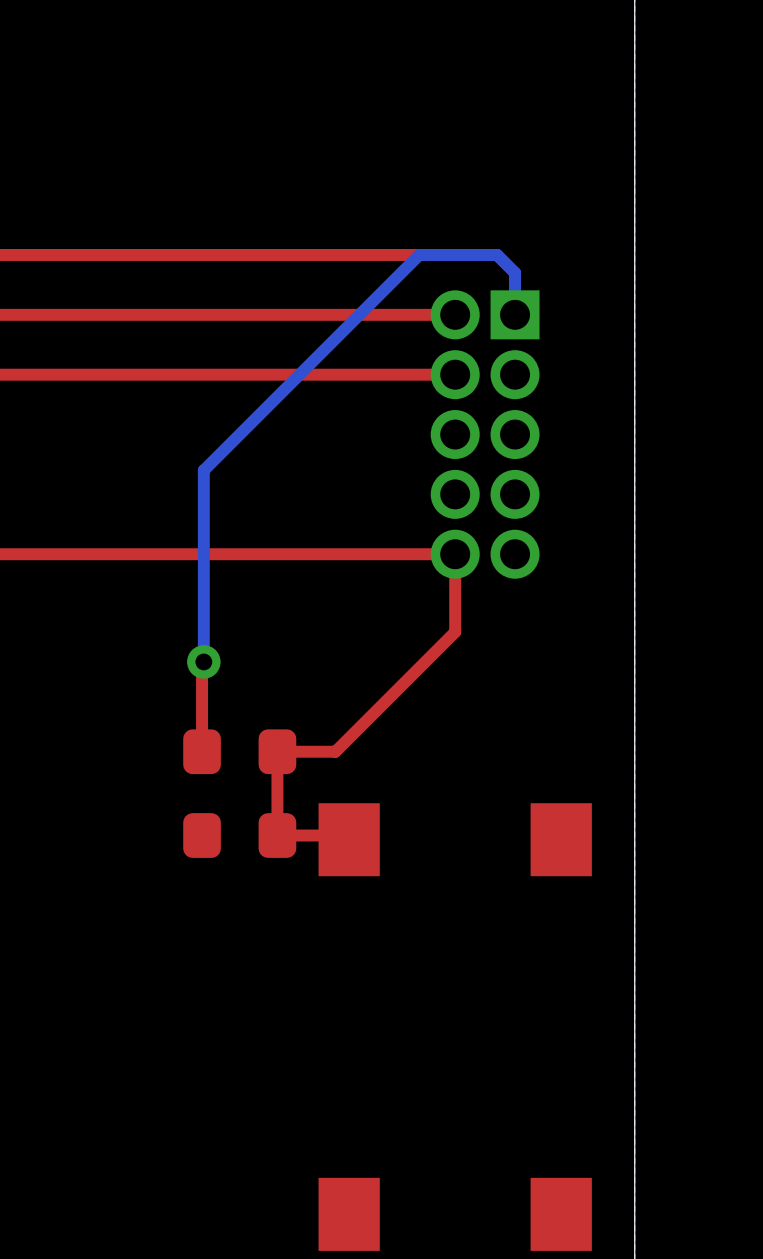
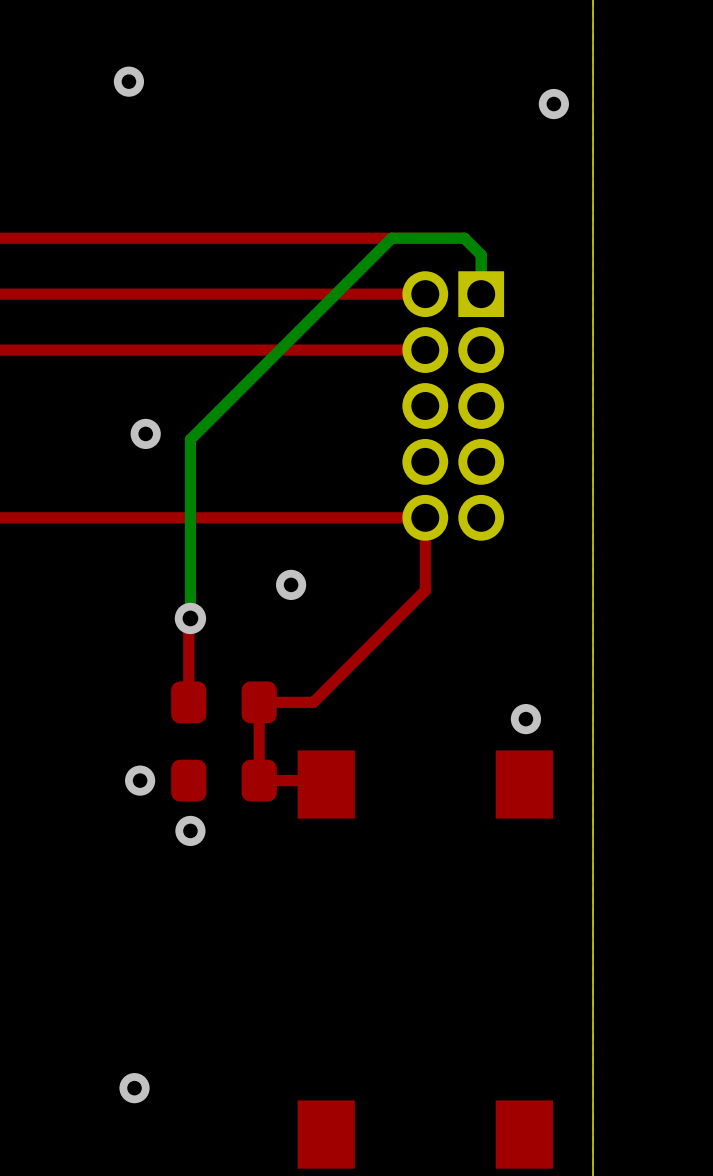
via: none -> (128, 81)
via: none -> (553, 104)
via: none -> (145, 433)
via: none -> (291, 584)
via: none -> (525, 719)
via: none -> (140, 780)
via: none -> (190, 830)
via: none -> (134, 1088)

